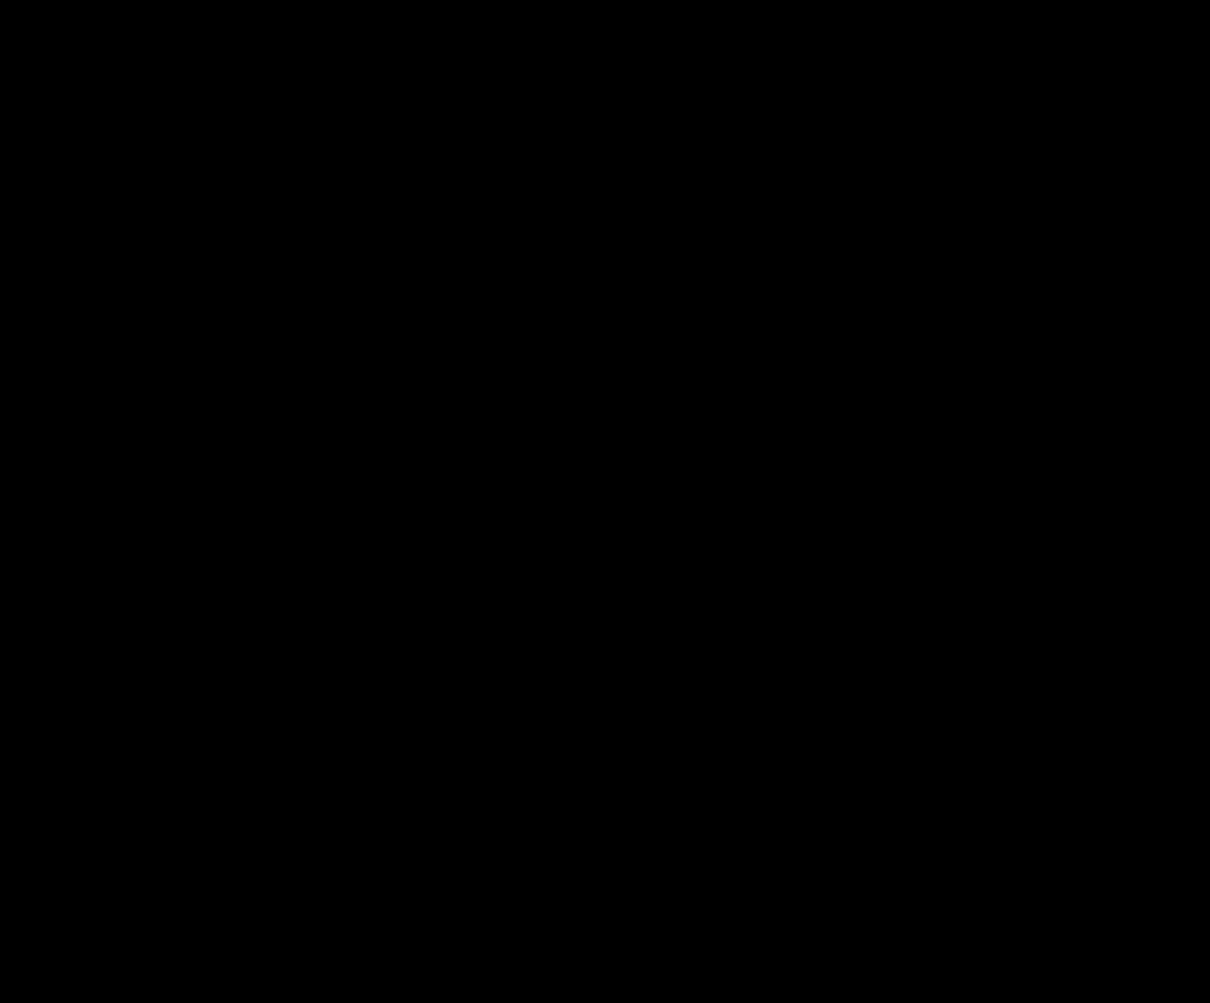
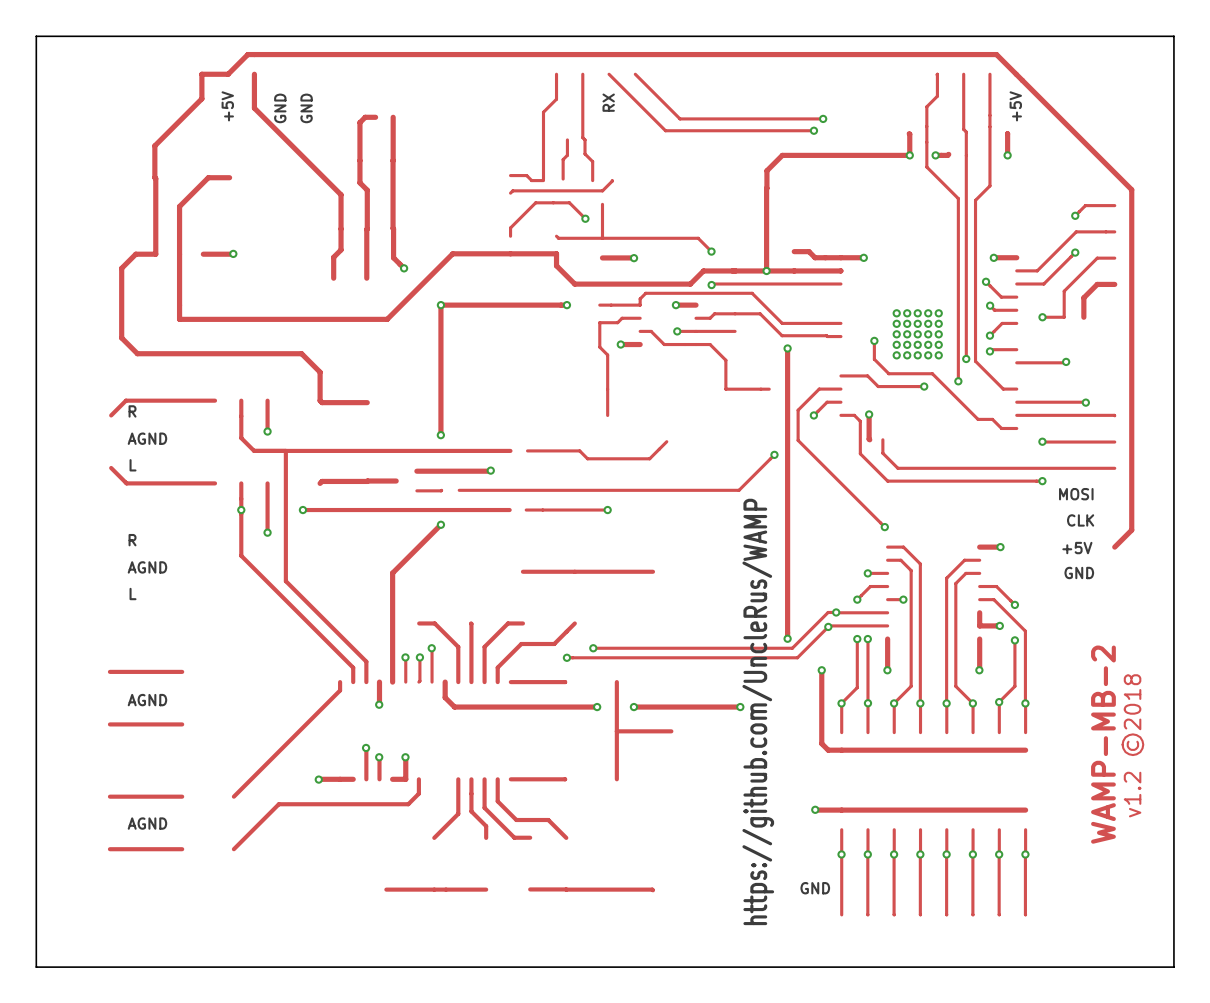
board edge: none -> (36, 36) (1173, 36) (1173, 967) (36, 967) (36, 36)
track: none -> (254, 74) (254, 108) (341, 194) (341, 249) (333, 257) (333, 278)
track: none -> (556, 74) (556, 99) (543, 112) (543, 179)
track: none -> (582, 74) (582, 137) (585, 139) (585, 153) (592, 161) (592, 180)
track: none -> (609, 74) (665, 130) (813, 130)
track: none -> (635, 74) (679, 118) (823, 118)
track: none -> (937, 74) (937, 96) (926, 106) (926, 167) (958, 198) (958, 381)
track: none -> (963, 74) (963, 129) (966, 132) (966, 358)
track: none -> (989, 74) (989, 185) (975, 200) (975, 361) (1003, 389) (1016, 389)
text: none -> RX (608, 102)
text: none -> +5V (227, 106)
text: none -> +5V (1015, 106)
text: none -> GND (280, 108)
text: none -> GND (306, 108)
track: none -> (375, 117) (365, 117) (359, 122) (359, 182) (367, 190) (366, 278)
track: none -> (393, 117) (393, 160)
via: none -> (823, 118)
via: none -> (813, 130)
track: none -> (909, 133) (909, 155)
track: none -> (1007, 133) (1007, 155)
track: none -> (567, 139) (567, 155) (563, 159) (563, 179)
track: none -> (948, 154) (935, 155)
track: none -> (909, 155) (782, 155) (766, 170) (766, 270)
via: none -> (909, 155)
via: none -> (935, 155)
via: none -> (1007, 155)
track: none -> (393, 160) (393, 257) (404, 268)
track: none -> (510, 175) (526, 175) (531, 180) (543, 180)
track: none -> (229, 177) (208, 177) (179, 206) (179, 319) (387, 319) (452, 253) (556, 253) (556, 265) (574, 284) (690, 284) (703, 270) (840, 270)
track: none -> (612, 180) (602, 190) (512, 190) (510, 193)
track: none -> (602, 204) (602, 238)
track: none -> (1114, 205) (1085, 205) (1075, 215)
via: none -> (1075, 215)
track: none -> (585, 218) (569, 202) (535, 202) (510, 227) (510, 236)
via: none -> (585, 218)
track: none -> (1114, 231) (1076, 231) (1037, 270) (1016, 270)
track: none -> (556, 236) (558, 238) (698, 238) (711, 251)
via: none -> (711, 251)
track: none -> (794, 251) (809, 251) (815, 257) (863, 257)
track: none -> (1075, 252) (1043, 284) (1016, 284)
via: none -> (1075, 252)
track: none -> (233, 253) (203, 254)
via: none -> (233, 253)
track: none -> (602, 257) (634, 258)
via: none -> (863, 257)
track: none -> (993, 257) (1016, 257)
via: none -> (993, 257)
via: none -> (634, 258)
track: none -> (1114, 258) (1097, 258) (1064, 291) (1064, 317) (1042, 317)
via: none -> (404, 268)
via: none -> (766, 270)
track: none -> (986, 281) (1001, 297) (1016, 297)
via: none -> (986, 281)
track: none -> (840, 284) (711, 285)
track: none -> (1114, 284) (1097, 284) (1083, 297) (1083, 317)
via: none -> (711, 285)
via: none -> (440, 305)
track: none -> (566, 305) (440, 305) (440, 435)
via: none -> (566, 305)
track: none -> (599, 305) (640, 305) (640, 298) (645, 293) (752, 293) (782, 323) (840, 323)
track: none -> (675, 305) (696, 305)
via: none -> (675, 305)
track: none -> (990, 305) (994, 310) (1016, 310)
via: none -> (990, 305)
via: none -> (896, 313)
via: none -> (907, 313)
via: none -> (917, 313)
via: none -> (928, 313)
via: none -> (938, 313)
via: none -> (1042, 317)
track: none -> (640, 318) (622, 318) (617, 322) (599, 322) (599, 347) (607, 355) (607, 415)
track: none -> (696, 318) (710, 318) (714, 313) (760, 313) (782, 335) (840, 336)
via: none -> (896, 323)
via: none -> (907, 323)
via: none -> (917, 323)
via: none -> (928, 323)
via: none -> (938, 323)
track: none -> (1016, 323) (1002, 323) (989, 335)
track: none -> (640, 331) (651, 331) (664, 344) (710, 344) (725, 360) (725, 389) (769, 389)
track: none -> (677, 331) (735, 331)
via: none -> (677, 331)
via: none -> (896, 334)
via: none -> (907, 334)
via: none -> (917, 334)
via: none -> (928, 334)
via: none -> (938, 334)
via: none -> (989, 335)
track: none -> (874, 340) (874, 359) (888, 373) (932, 373) (978, 419) (992, 419) (1001, 428) (1016, 428)
via: none -> (874, 340)
track: none -> (620, 344) (640, 344)
via: none -> (620, 344)
via: none -> (896, 344)
via: none -> (907, 344)
via: none -> (917, 344)
via: none -> (928, 344)
via: none -> (938, 344)
track: none -> (787, 348) (787, 638)
via: none -> (787, 348)
track: none -> (1016, 349) (991, 349) (989, 351)
via: none -> (989, 351)
via: none -> (896, 355)
via: none -> (907, 355)
via: none -> (917, 355)
via: none -> (928, 355)
via: none -> (938, 355)
via: none -> (966, 358)
track: none -> (1066, 361) (1016, 362)
via: none -> (1066, 361)
track: none -> (840, 375) (867, 375) (878, 386) (924, 386)
via: none -> (958, 381)
via: none -> (924, 386)
track: none -> (840, 389) (819, 389) (798, 410) (798, 440) (884, 527)
track: none -> (215, 400) (125, 400) (111, 415)
track: none -> (241, 400) (241, 438) (254, 450) (510, 450)
track: none -> (267, 400) (267, 431)
track: none -> (367, 402) (322, 402) (320, 400) (320, 372) (301, 353) (137, 353) (121, 337) (121, 268) (135, 254) (155, 254) (154, 145) (201, 98) (201, 74) (228, 74) (247, 54) (996, 54) (1131, 189) (1131, 530) (1114, 547)
track: none -> (840, 402) (827, 402) (813, 415)
track: none -> (1016, 402) (1085, 402)
via: none -> (1085, 402)
text: none -> R (132, 411)
track: none -> (869, 414) (869, 439)
via: none -> (869, 414)
via: none -> (813, 415)
track: none -> (840, 415) (854, 415) (860, 421) (860, 453) (887, 481) (1042, 481)
track: none -> (1016, 415) (1114, 415)
via: none -> (267, 431)
via: none -> (440, 435)
text: none -> AGND (147, 438)
track: none -> (882, 439) (882, 453) (897, 468) (1114, 468)
track: none -> (666, 441) (649, 458) (587, 458) (579, 450) (527, 450)
track: none -> (1042, 441) (1114, 442)
via: none -> (1042, 441)
track: none -> (285, 450) (285, 581) (366, 661) (366, 682)
track: none -> (774, 454) (739, 490) (459, 490)
via: none -> (774, 454)
text: none -> L (133, 465)
track: none -> (111, 467) (126, 483) (215, 483)
track: none -> (490, 470) (416, 471)
via: none -> (490, 470)
track: none -> (396, 481) (322, 481) (320, 483)
via: none -> (1042, 481)
track: none -> (241, 483) (241, 555) (353, 667) (353, 682)
track: none -> (267, 483) (267, 532)
track: none -> (441, 490) (416, 490)
text: none -> MOSI (1076, 494)
via: none -> (241, 510)
track: none -> (302, 510) (509, 510)
via: none -> (302, 510)
track: none -> (526, 510) (607, 510)
via: none -> (607, 510)
text: none -> CLK (1080, 520)
track: none -> (440, 524) (392, 573) (392, 682)
via: none -> (440, 524)
via: none -> (884, 527)
via: none -> (267, 532)
text: none -> R (132, 540)
track: none -> (887, 547) (903, 547) (920, 563) (920, 703)
track: none -> (979, 547) (1000, 547)
via: none -> (1000, 547)
text: none -> +5V (1077, 548)
track: none -> (887, 560) (900, 560) (911, 570) (911, 686) (894, 703) (894, 732)
track: none -> (979, 560) (964, 560) (946, 578) (946, 703)
text: none -> AGND (147, 567)
track: none -> (522, 571) (652, 571)
text: none -> GND (1079, 572)
track: none -> (867, 573) (887, 573)
via: none -> (867, 573)
track: none -> (979, 573) (965, 573) (955, 583) (955, 686) (973, 703) (973, 732)
track: none -> (887, 586) (870, 586) (857, 599)
track: none -> (979, 586) (996, 586) (1014, 604)
text: none -> L (133, 594)
via: none -> (857, 599)
track: none -> (887, 599) (903, 599)
via: none -> (903, 599)
track: none -> (979, 599) (993, 599) (1025, 631) (1025, 703)
via: none -> (1014, 604)
via: none -> (836, 612)
track: none -> (887, 612) (828, 612) (792, 648) (593, 648)
track: none -> (979, 612) (979, 625) (999, 625)
track: none -> (419, 623) (434, 623) (458, 646) (458, 682)
track: none -> (471, 623) (471, 682)
track: none -> (522, 623) (508, 623) (484, 646) (484, 682)
track: none -> (574, 623) (554, 644) (521, 644) (497, 667) (497, 682)
track: none -> (887, 625) (829, 625) (797, 657) (566, 657)
via: none -> (999, 625)
via: none -> (828, 626)
via: none -> (787, 638)
track: none -> (857, 639) (857, 687) (841, 703) (841, 732)
via: none -> (857, 639)
track: none -> (867, 639) (867, 732)
via: none -> (867, 639)
track: none -> (887, 639) (887, 670)
track: none -> (979, 639) (979, 670)
track: none -> (1014, 640) (1014, 686) (999, 702)
via: none -> (1014, 640)
track: none -> (431, 648) (432, 682)
via: none -> (431, 648)
via: none -> (593, 648)
track: none -> (405, 657) (405, 682)
via: none -> (405, 657)
track: none -> (419, 657) (418, 682)
via: none -> (419, 657)
via: none -> (566, 657)
track: none -> (821, 670) (821, 743) (828, 750) (1025, 750)
via: none -> (821, 670)
via: none -> (887, 670)
via: none -> (979, 670)
track: none -> (109, 671) (182, 671)
track: none -> (340, 682) (340, 690) (233, 796)
track: none -> (379, 682) (379, 704)
track: none -> (445, 682) (445, 697) (454, 707) (597, 707)
track: none -> (510, 682) (565, 682)
track: none -> (616, 682) (616, 779)
text: none -> AGND (147, 700)
track: none -> (999, 702) (999, 732)
via: none -> (999, 702)
via: none -> (841, 703)
via: none -> (867, 703)
via: none -> (894, 703)
track: none -> (920, 703) (920, 732)
via: none -> (920, 703)
track: none -> (946, 703) (946, 732)
via: none -> (946, 703)
via: none -> (972, 703)
track: none -> (1025, 703) (1025, 732)
via: none -> (1025, 703)
via: none -> (379, 704)
via: none -> (597, 707)
track: none -> (633, 707) (740, 707)
via: none -> (633, 707)
via: none -> (740, 707)
text: none -> https://github.com/UncleRus/WAMP (758, 711)
track: none -> (109, 724) (182, 724)
track: none -> (616, 731) (671, 731)
text: none -> WAMP-MB-2 (1103, 744)
text: none -> v1.2 ©2018 (1132, 745)
track: none -> (366, 747) (366, 779)
via: none -> (366, 747)
track: none -> (379, 757) (379, 779)
via: none -> (379, 757)
track: none -> (405, 757) (405, 779) (392, 779)
via: none -> (405, 757)
via: none -> (318, 779)
track: none -> (353, 779) (318, 779)
track: none -> (418, 779) (418, 793) (408, 804) (278, 804) (233, 849)
track: none -> (458, 779) (458, 813) (434, 837)
track: none -> (471, 779) (471, 811) (486, 826) (486, 837)
track: none -> (484, 779) (484, 807) (514, 837) (530, 837)
track: none -> (497, 779) (497, 801) (516, 820) (548, 820) (566, 837)
track: none -> (510, 779) (565, 779)
track: none -> (109, 796) (182, 796)
track: none -> (815, 809) (1025, 810)
via: none -> (815, 809)
text: none -> AGND (147, 823)
track: none -> (841, 829) (841, 914)
track: none -> (867, 829) (867, 854)
track: none -> (894, 829) (894, 854)
track: none -> (920, 829) (920, 854)
track: none -> (946, 829) (946, 854)
track: none -> (973, 829) (972, 854)
track: none -> (999, 829) (999, 854)
track: none -> (1025, 829) (1025, 854)
track: none -> (109, 849) (182, 849)
via: none -> (841, 854)
track: none -> (867, 854) (867, 914)
via: none -> (867, 854)
track: none -> (894, 854) (894, 914)
via: none -> (894, 854)
track: none -> (920, 854) (920, 914)
via: none -> (920, 854)
track: none -> (946, 854) (946, 914)
via: none -> (946, 854)
track: none -> (972, 854) (973, 914)
via: none -> (972, 854)
track: none -> (999, 854) (999, 914)
via: none -> (999, 854)
track: none -> (1025, 854) (1025, 914)
via: none -> (1025, 854)
text: none -> GND (815, 888)
track: none -> (386, 889) (486, 889)
track: none -> (530, 889) (652, 890)

